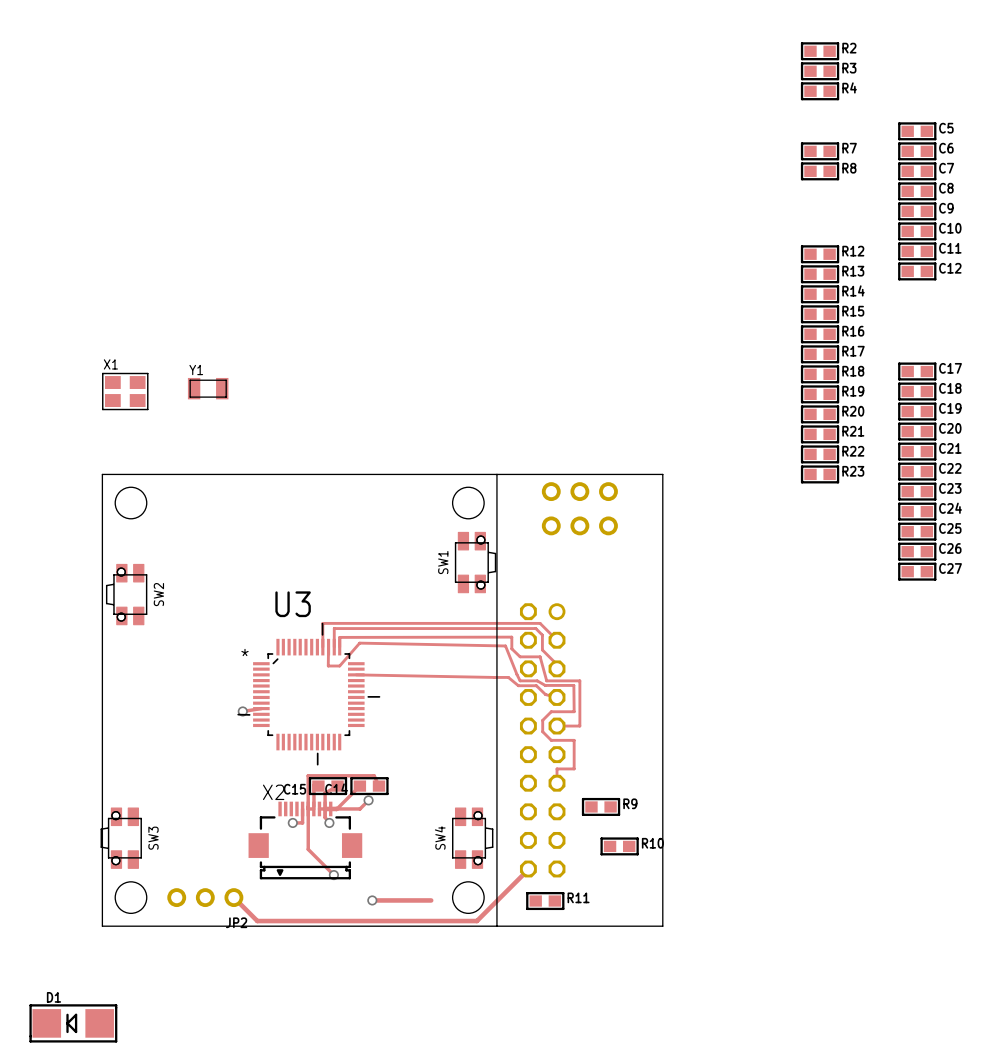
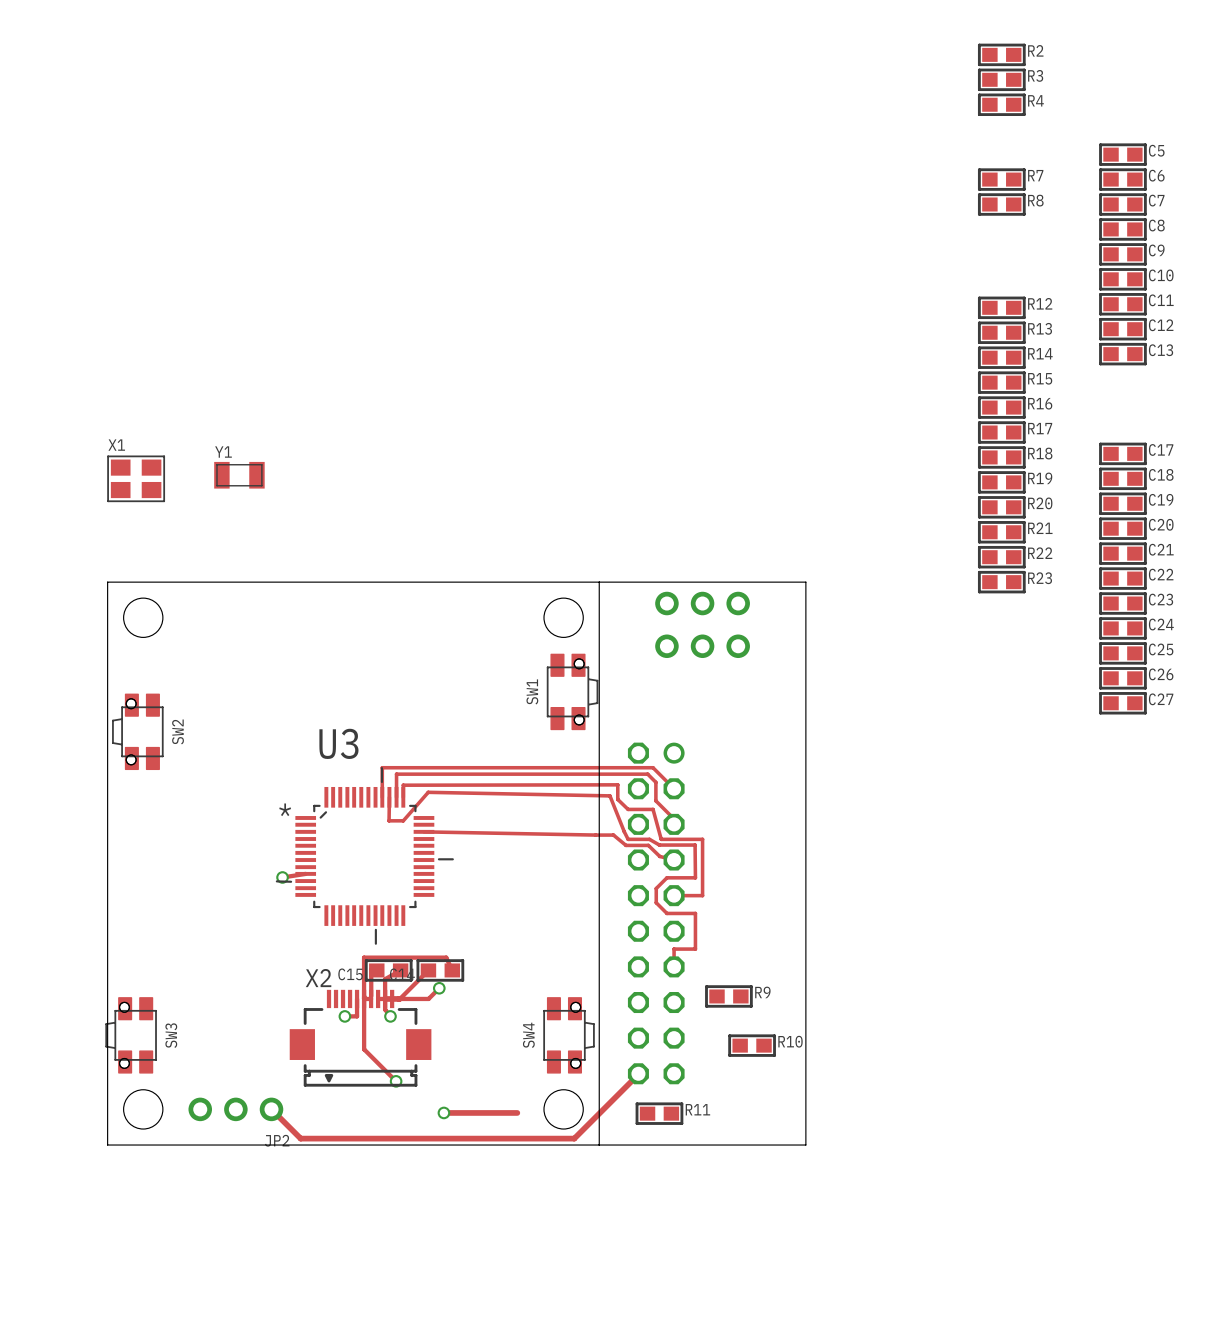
C13: none -> (1122, 354)
D1: (73, 1023) -> none

